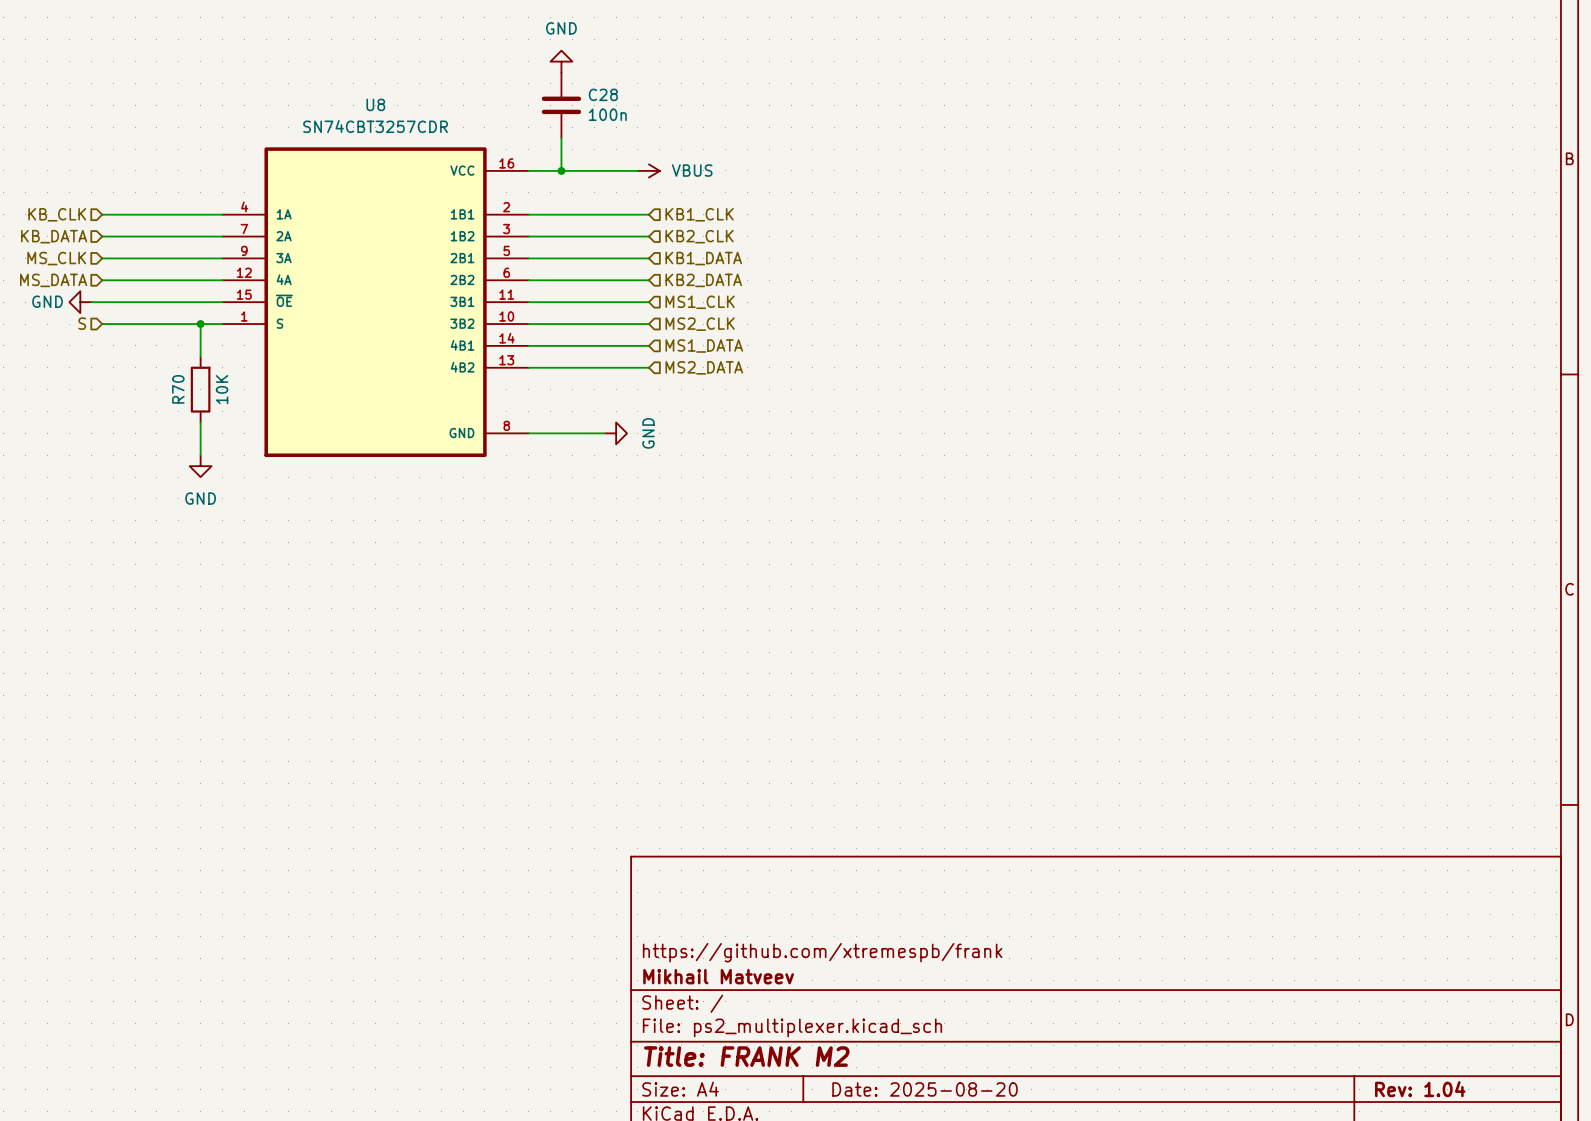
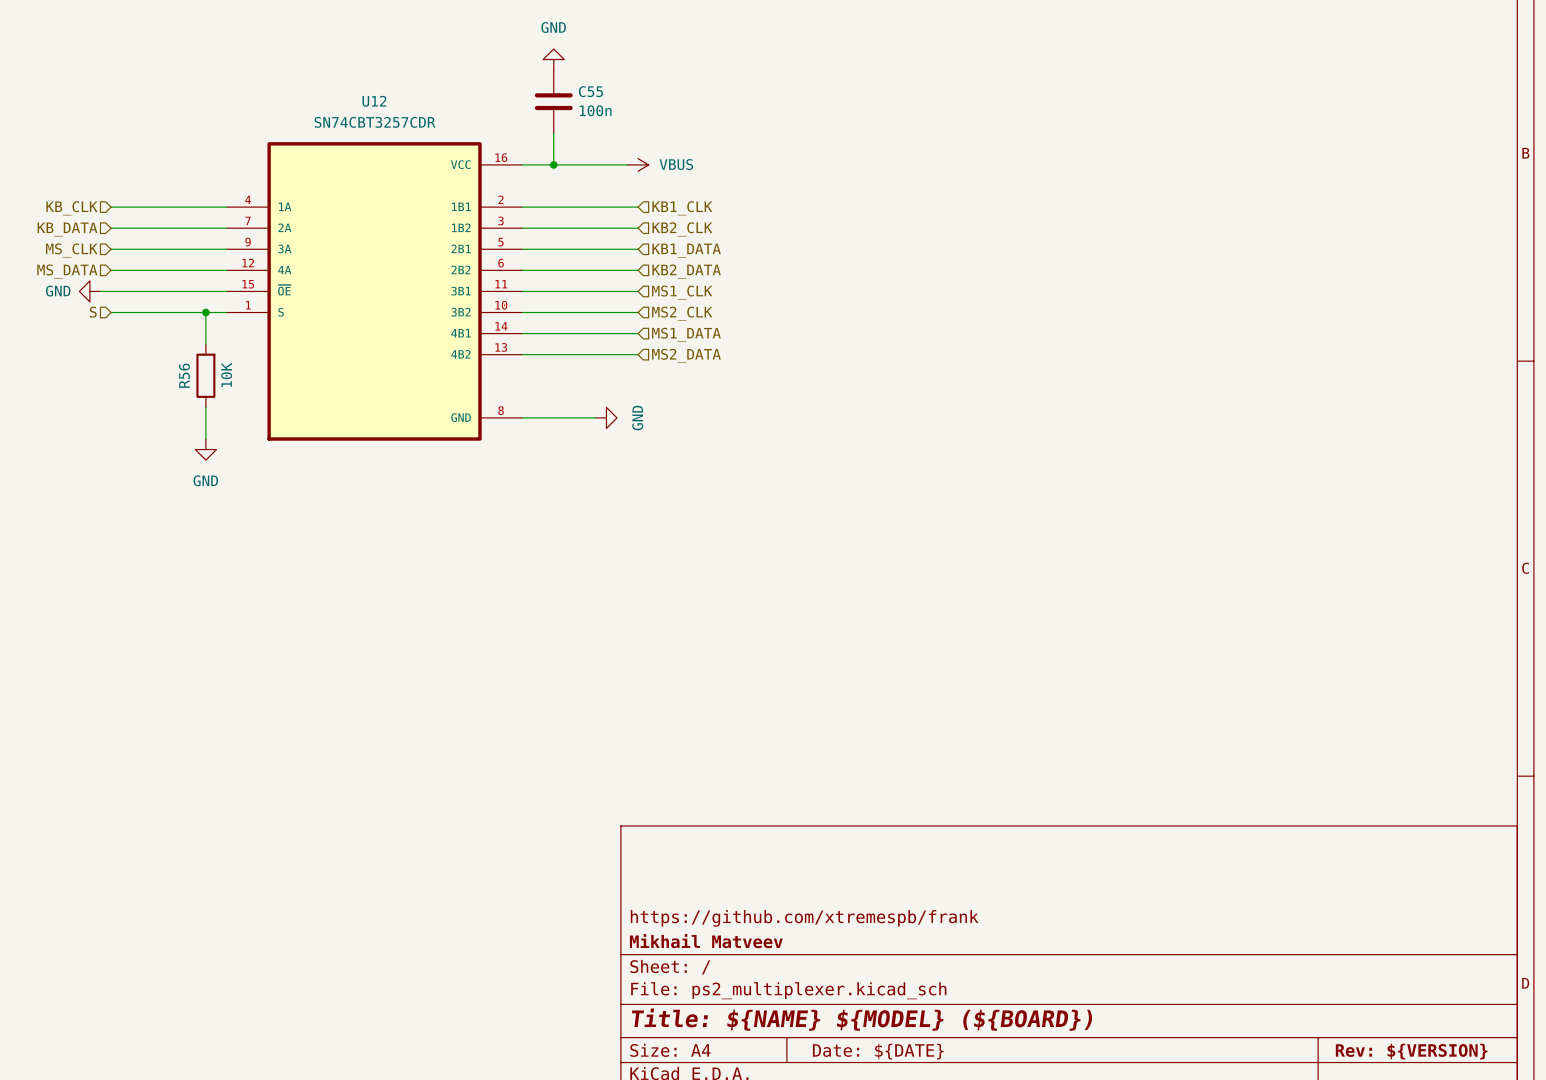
C28 name: C28 (603, 94) -> C55 (590, 91)
U8 name: U8 (375, 104) -> U12 (374, 101)
R70 name: R70 (178, 389) -> R56 (184, 375)
title block: Title: FRANK M2 (746, 1056) -> Title: ${NAME} ${MODEL} (${BOARD}) (862, 1019)
title block: Date: 2025-08-20 (925, 1089) -> Date: ${DATE} (878, 1051)
title block: Rev: 1.04 (1420, 1089) -> Rev: ${VERSION} (1411, 1051)

